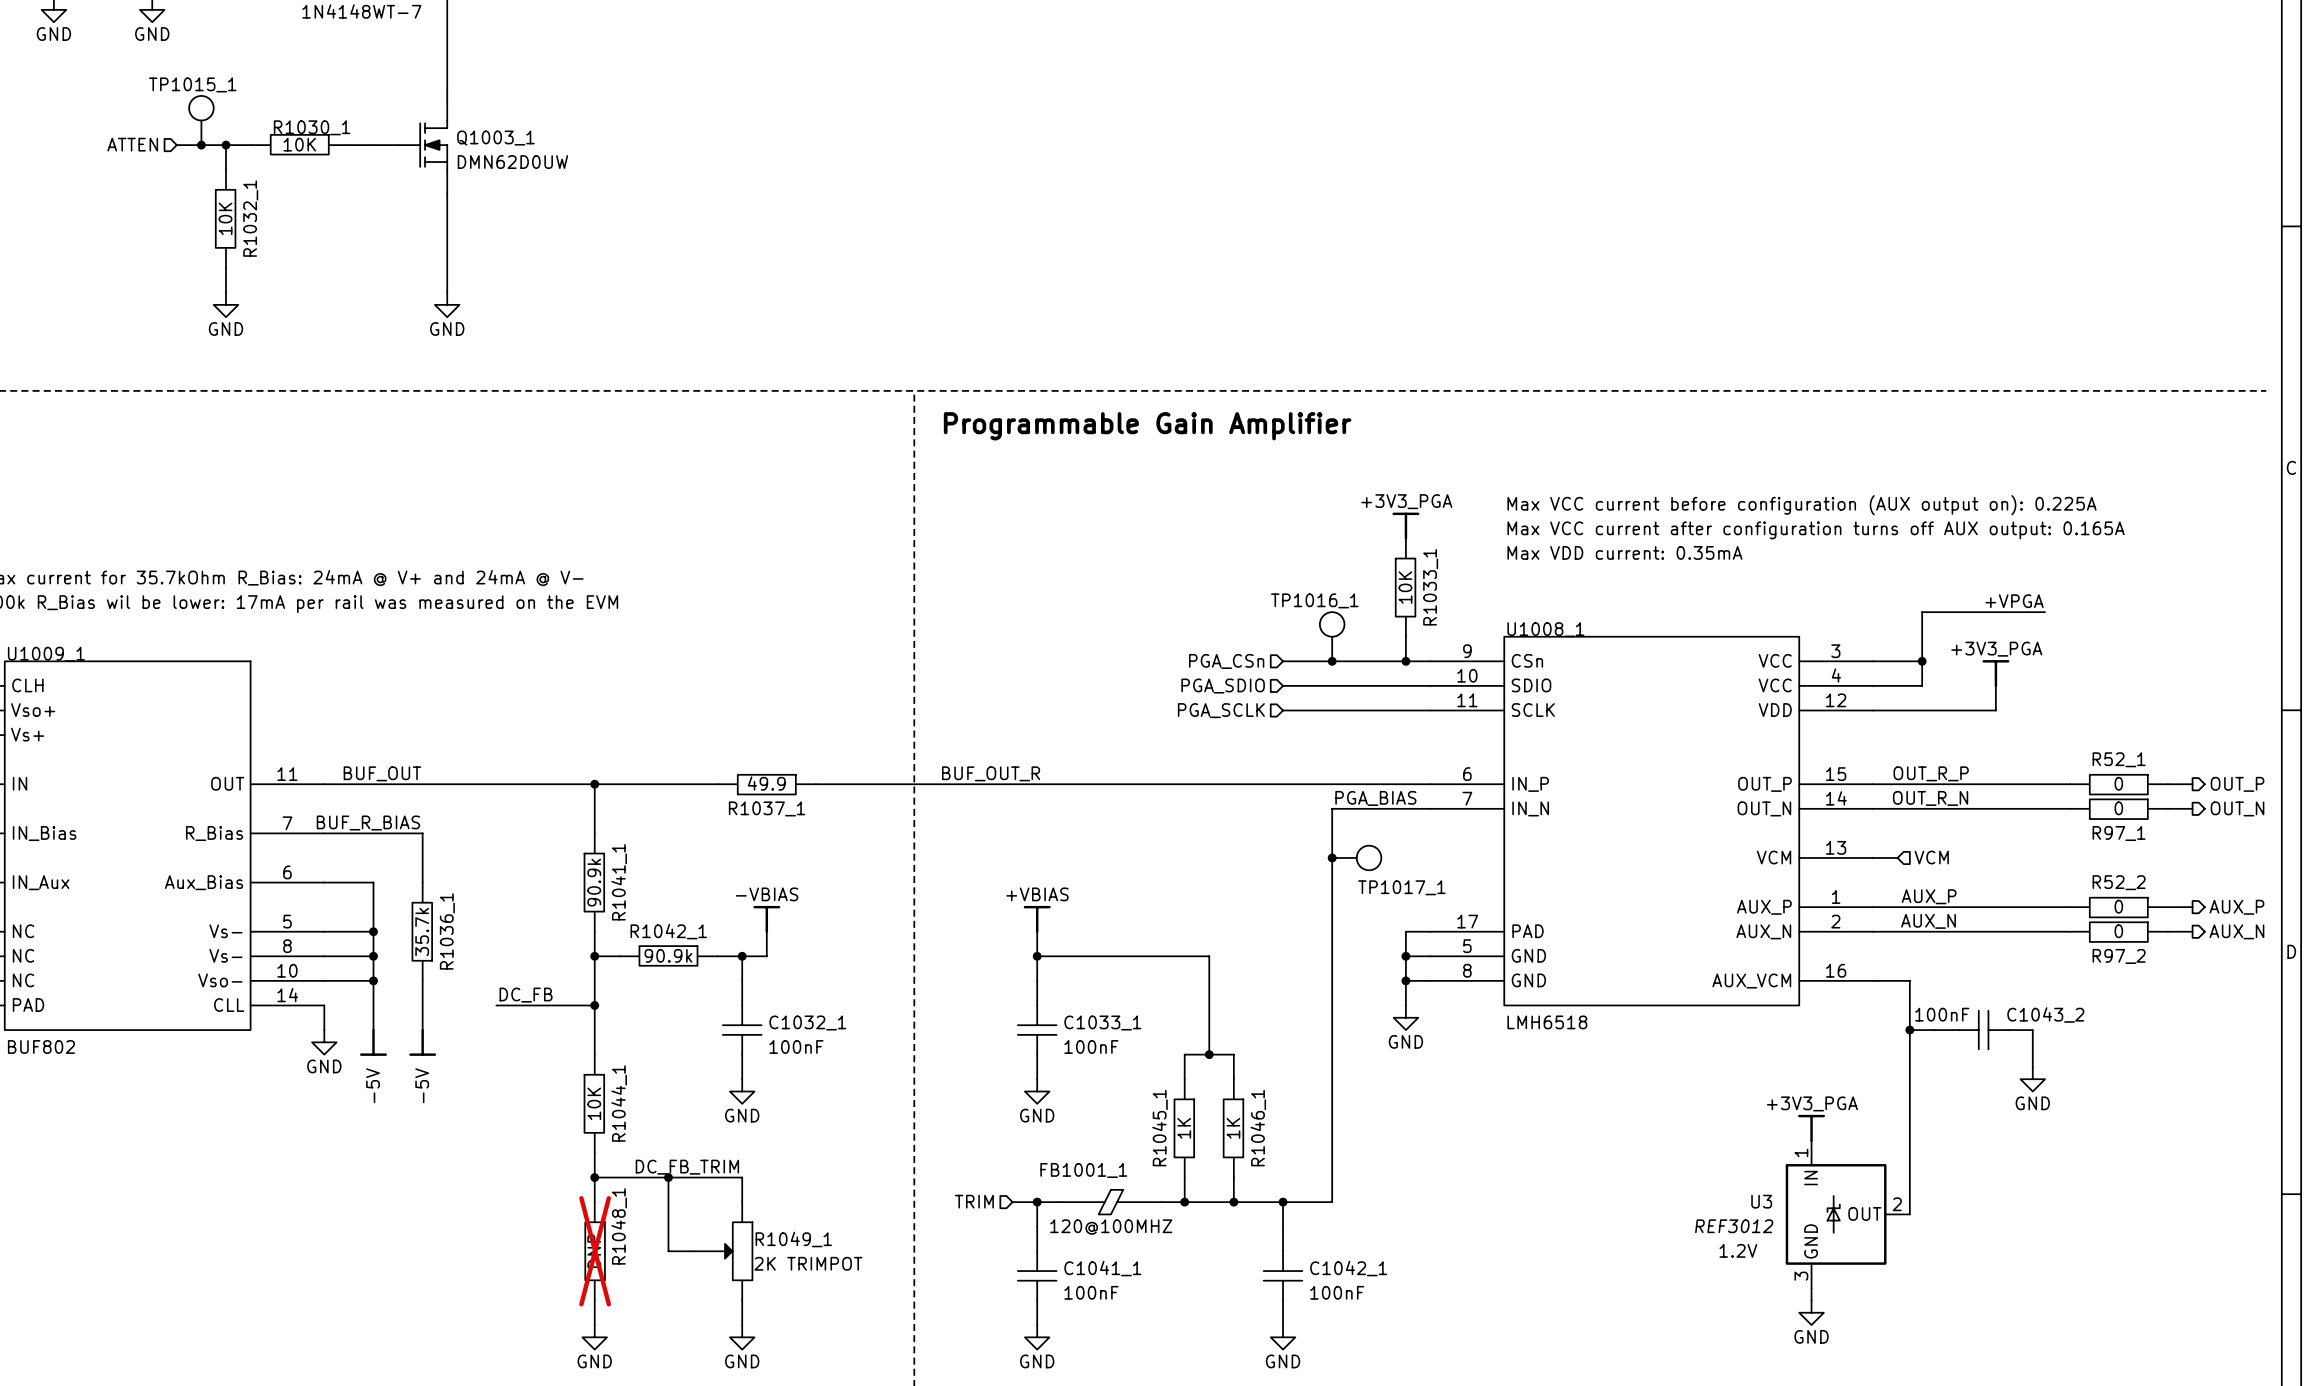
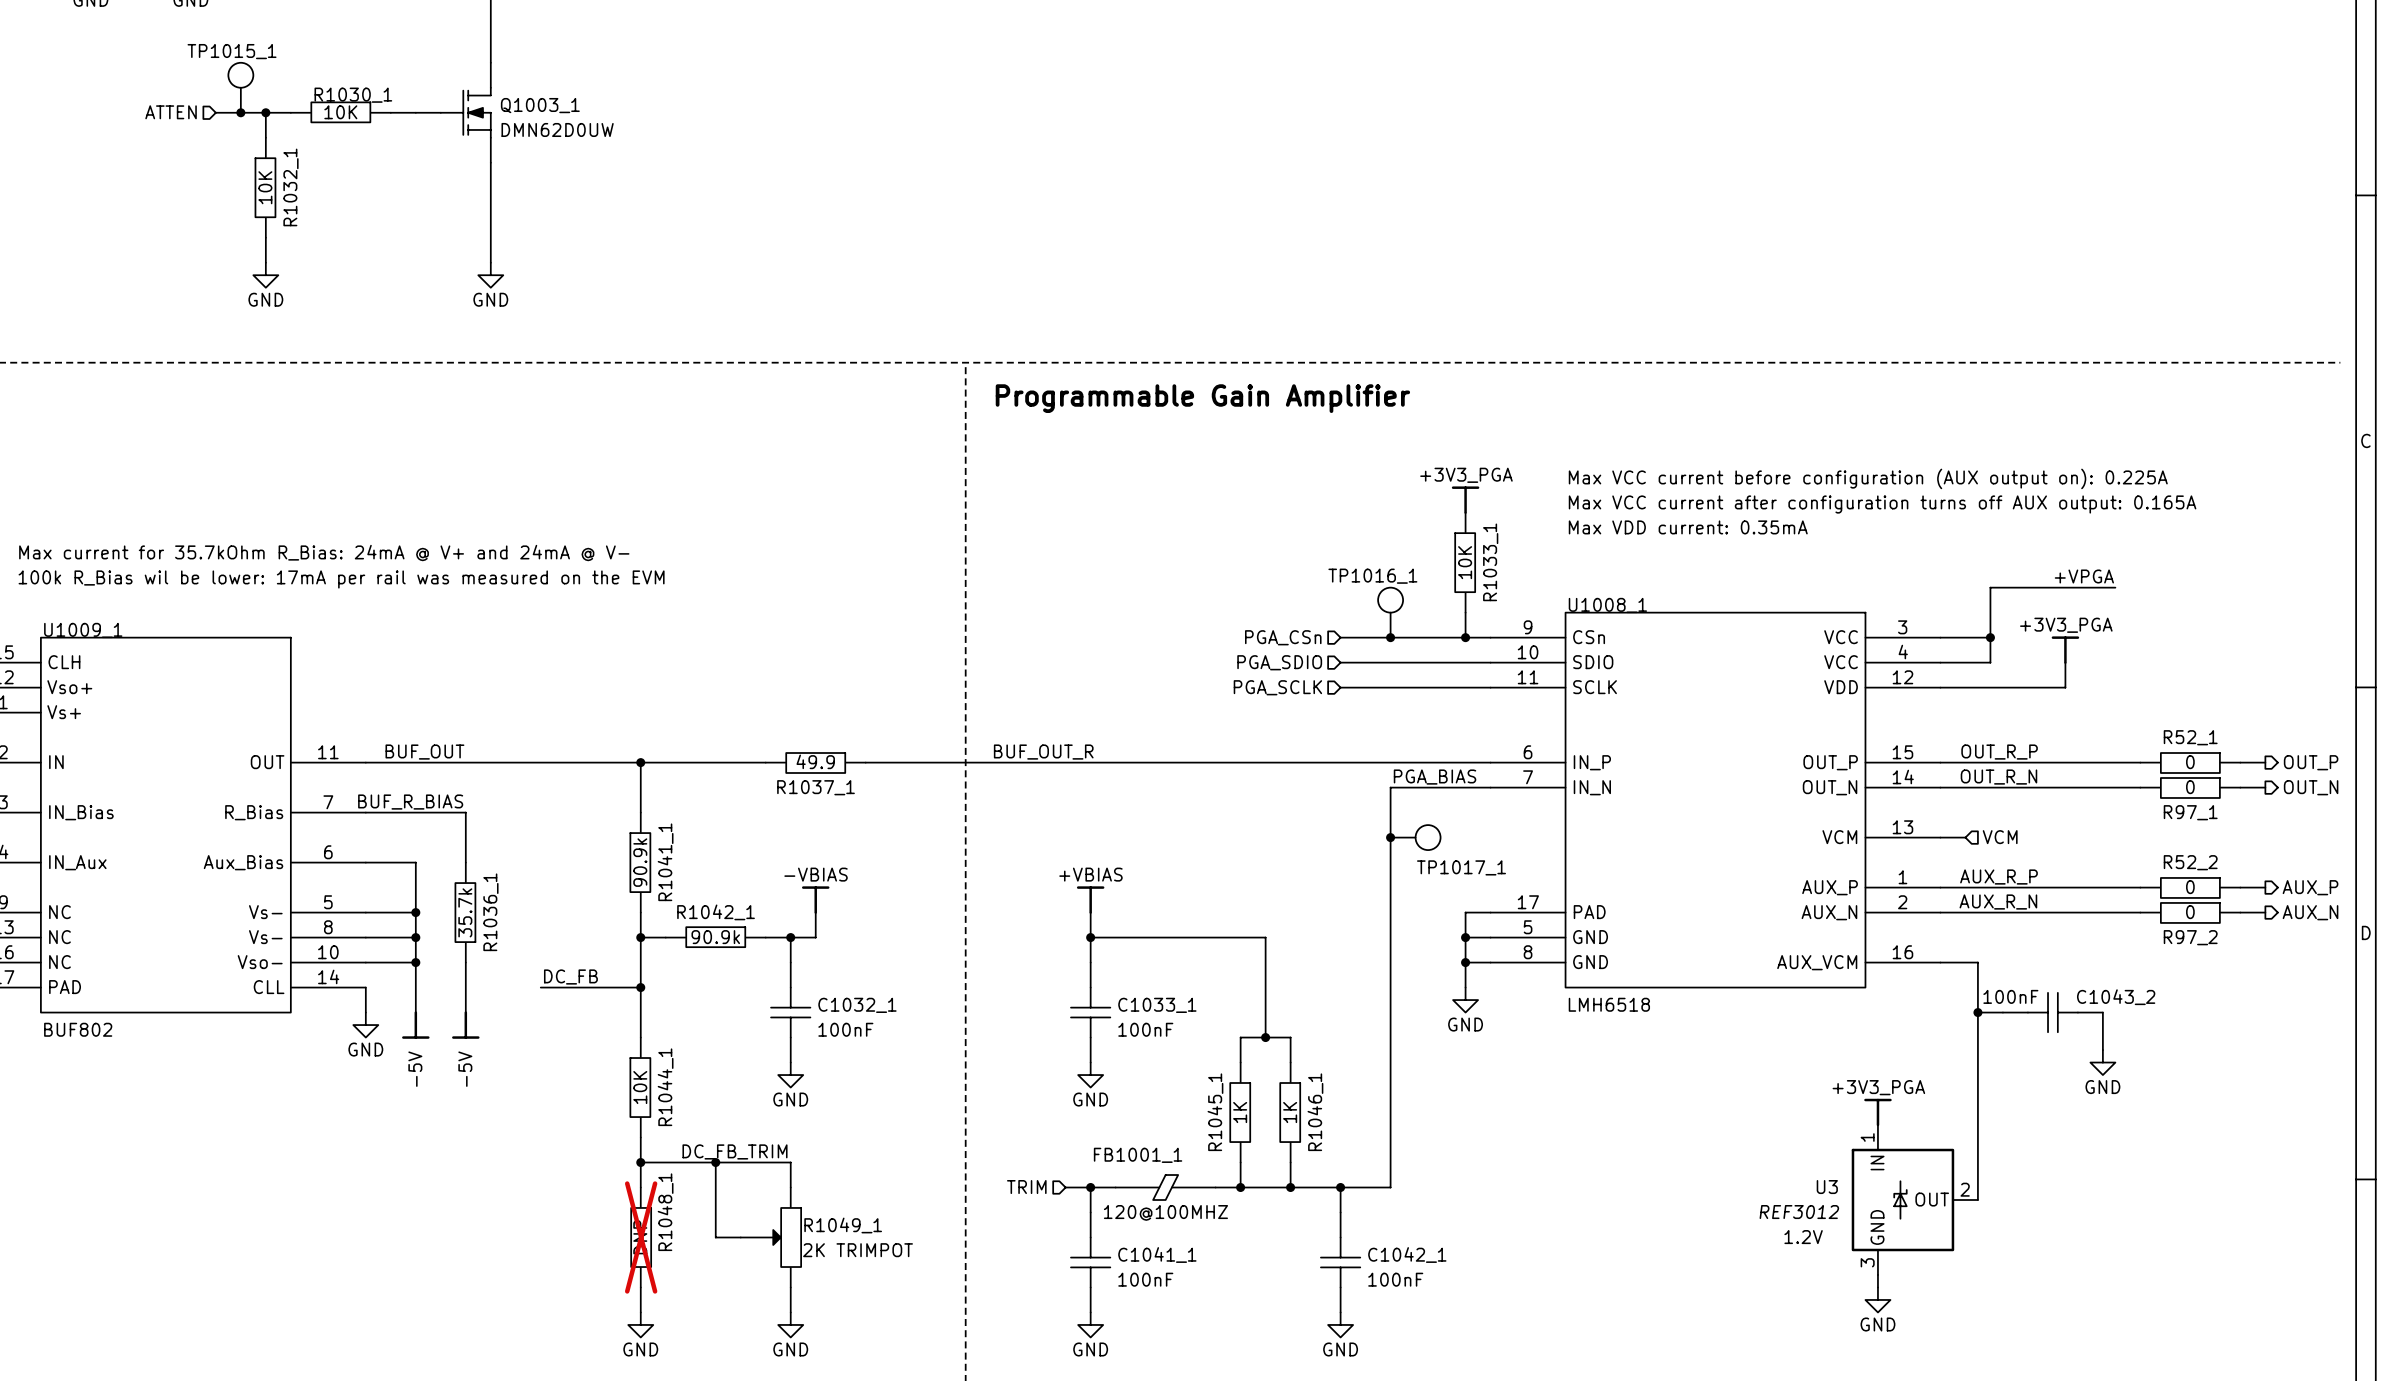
label: AUX_P (1929, 896) -> AUX_R_P (1998, 877)
label: AUX_N (1928, 921) -> AUX_R_N (1998, 902)

